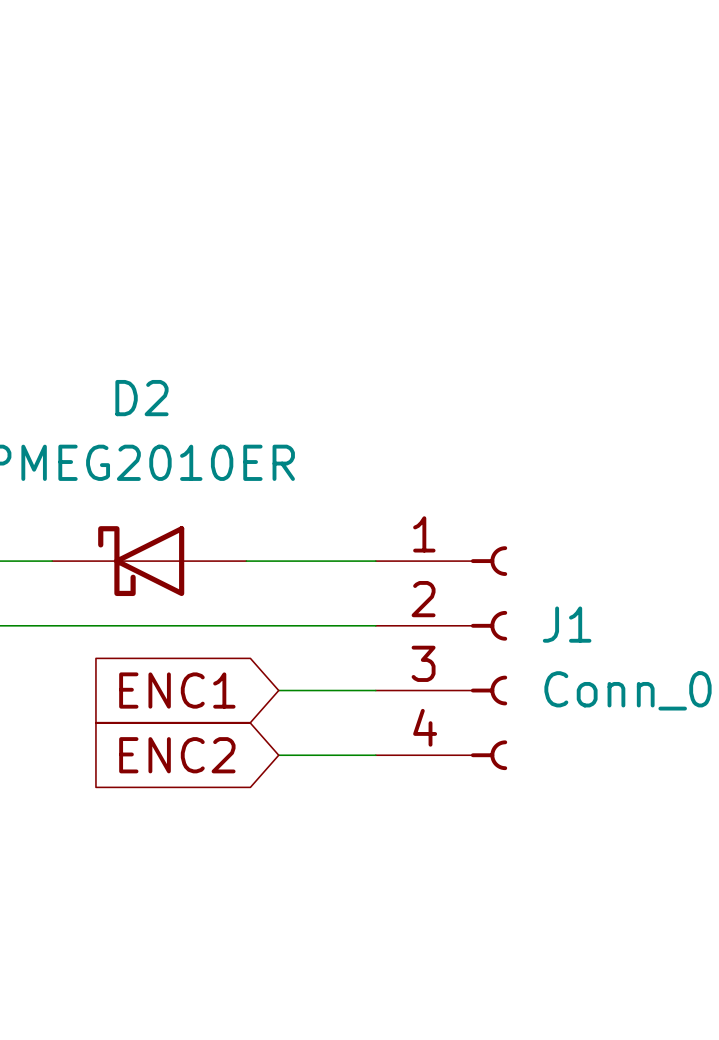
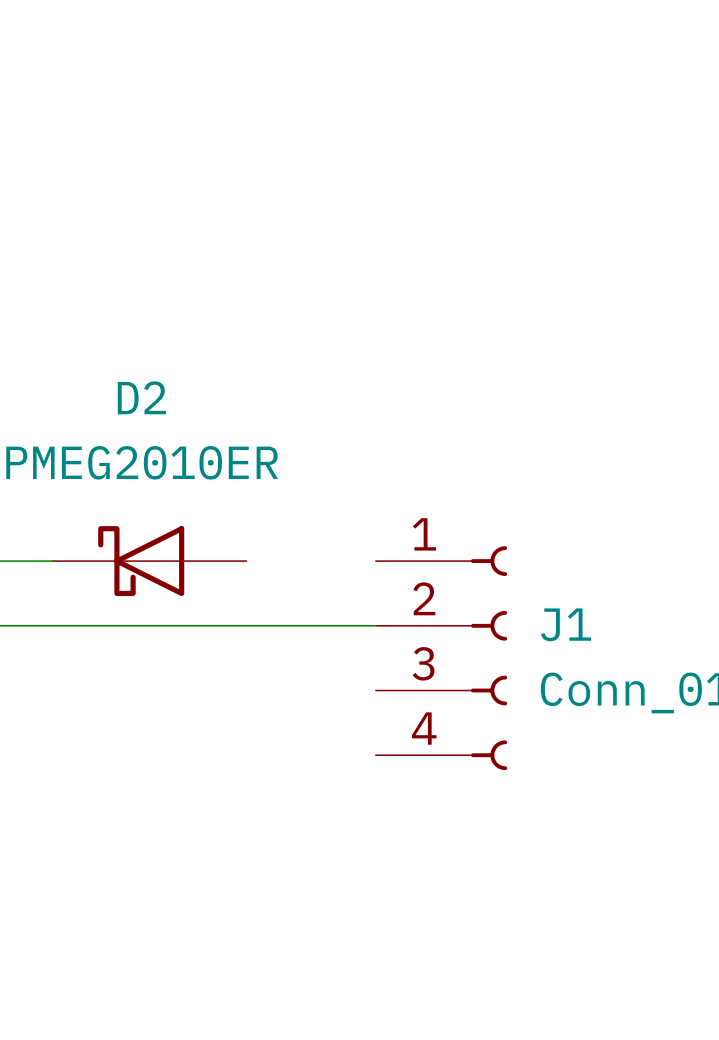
wire: (246, 561) (375, 561) -> none
global label: ENC1 (177, 690) -> none
wire: (278, 690) (375, 690) -> none
global label: ENC2 (177, 755) -> none
wire: (278, 755) (375, 755) -> none

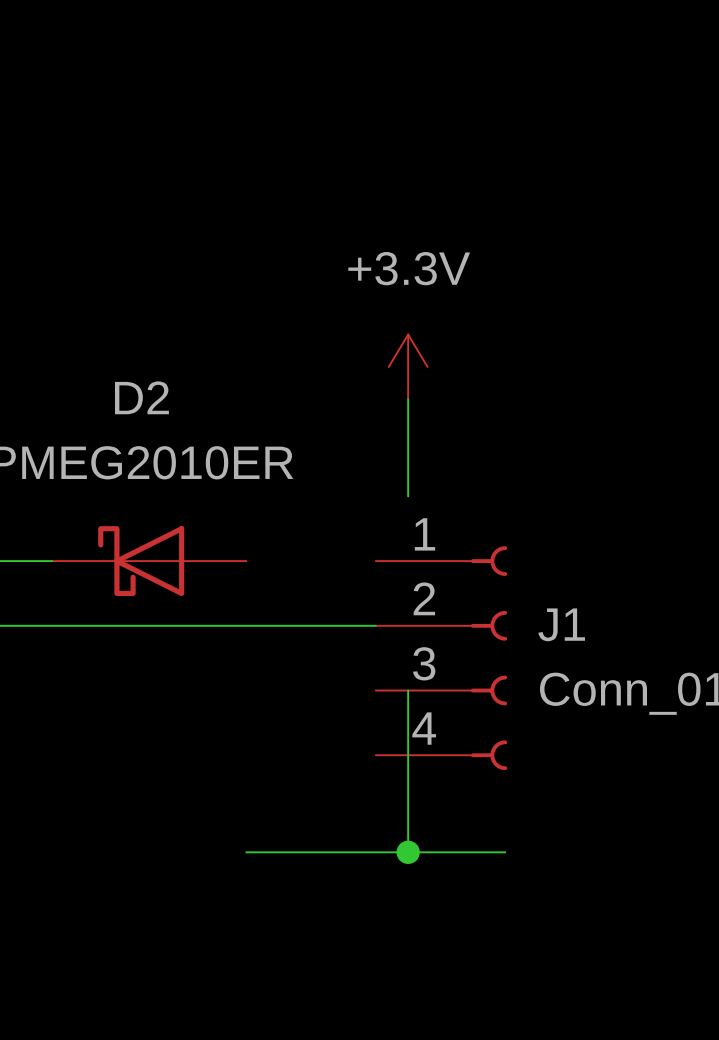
power symbol: none -> +3.3V (408, 366)
wire: none -> (408, 399) (408, 496)
wire: none -> (408, 690) (408, 852)
wire: none -> (246, 852) (505, 852)
junction: none -> (408, 852)

